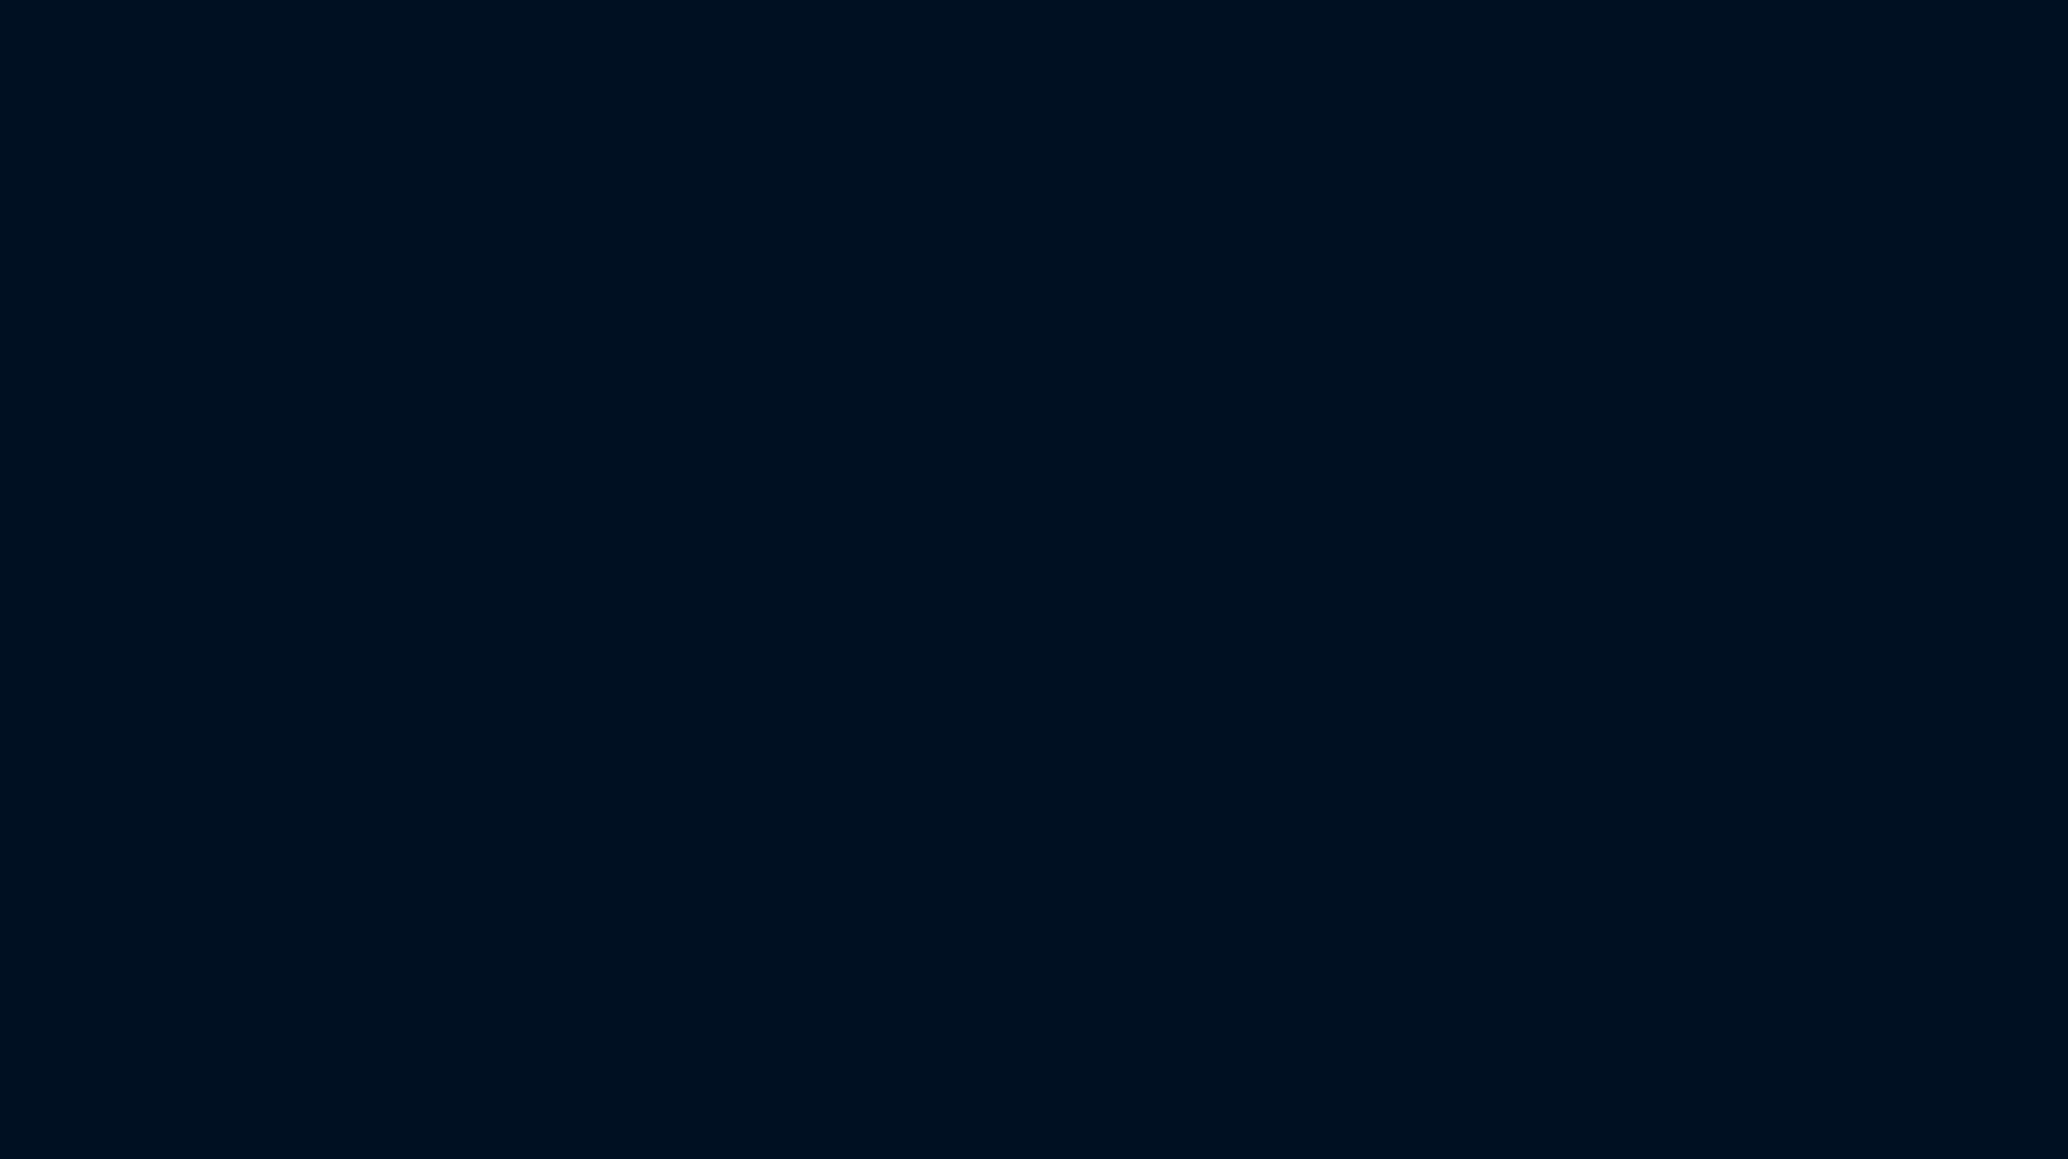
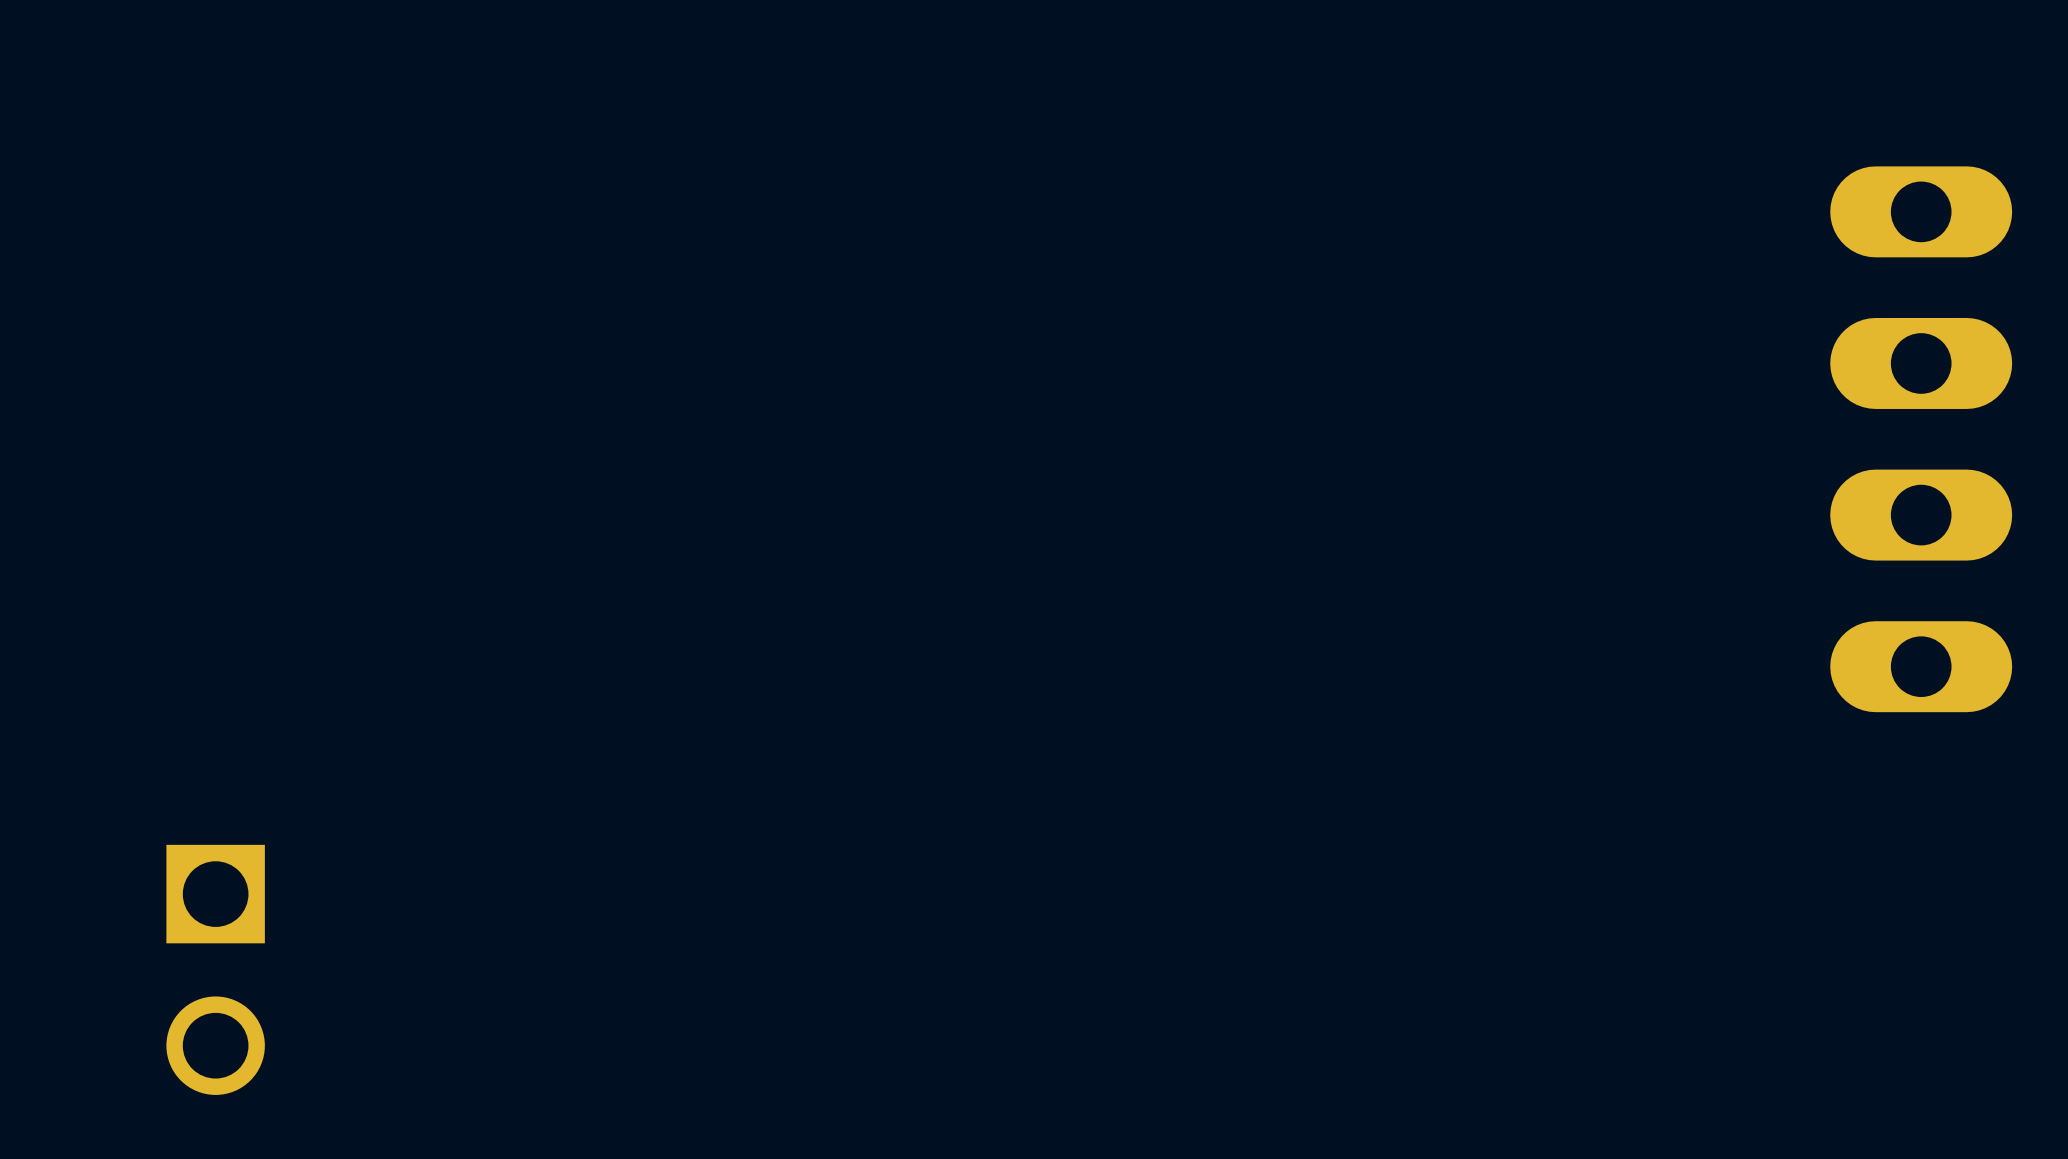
part: none -> (1921, 439)
part: none -> (215, 969)

